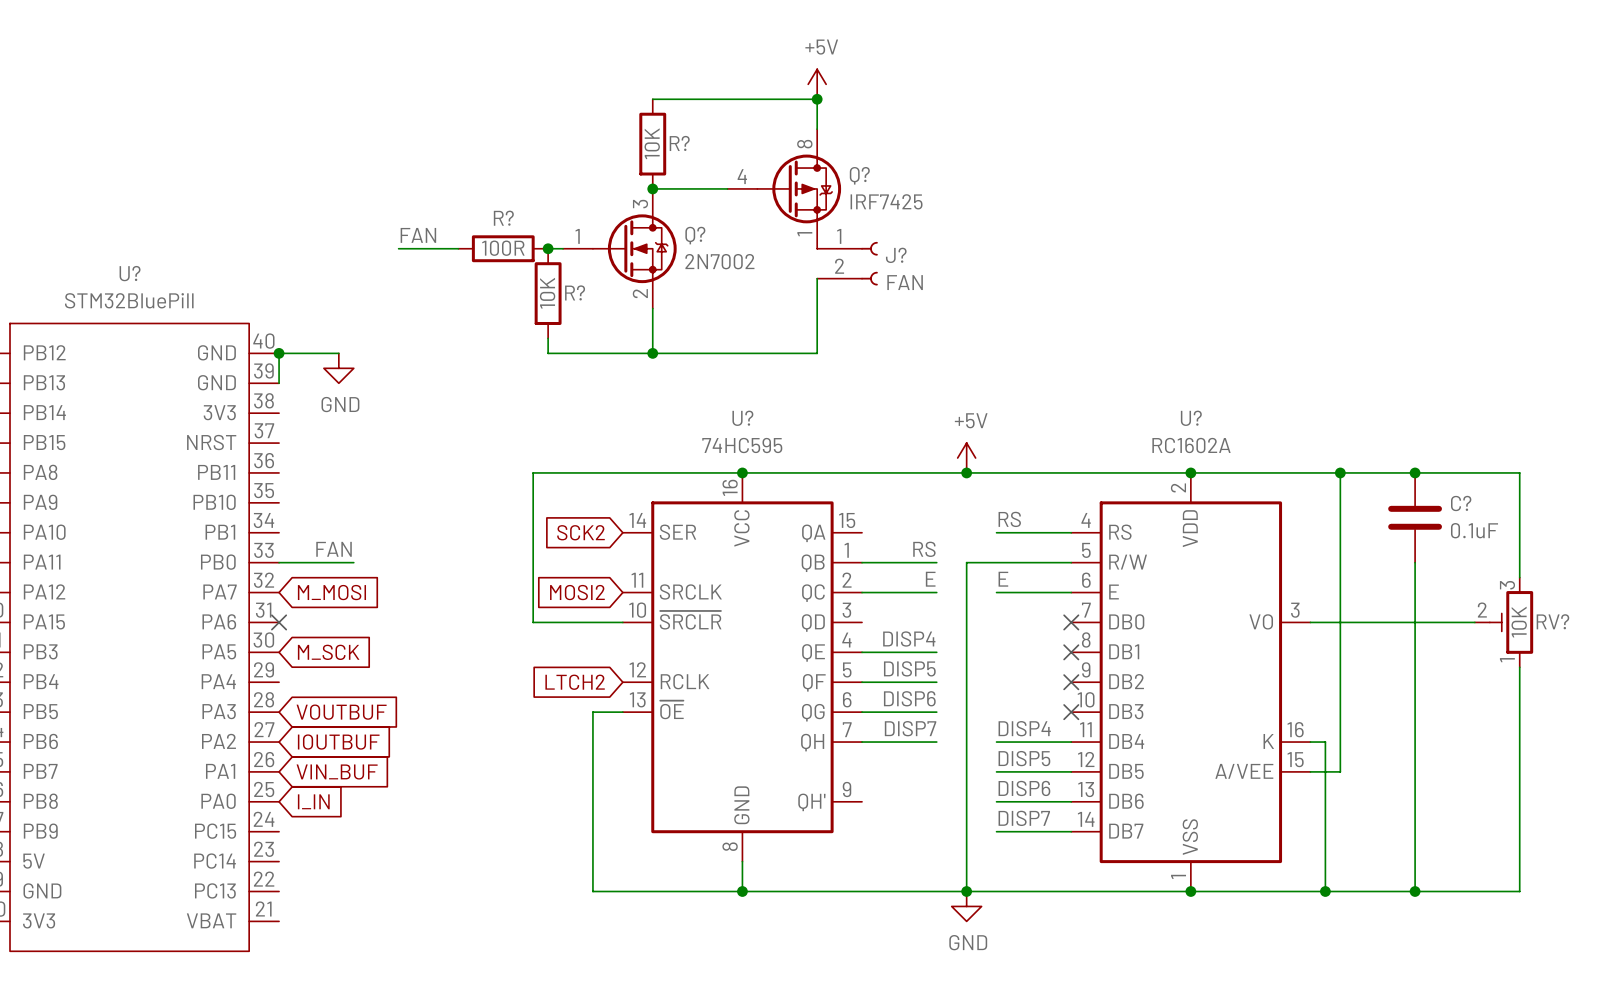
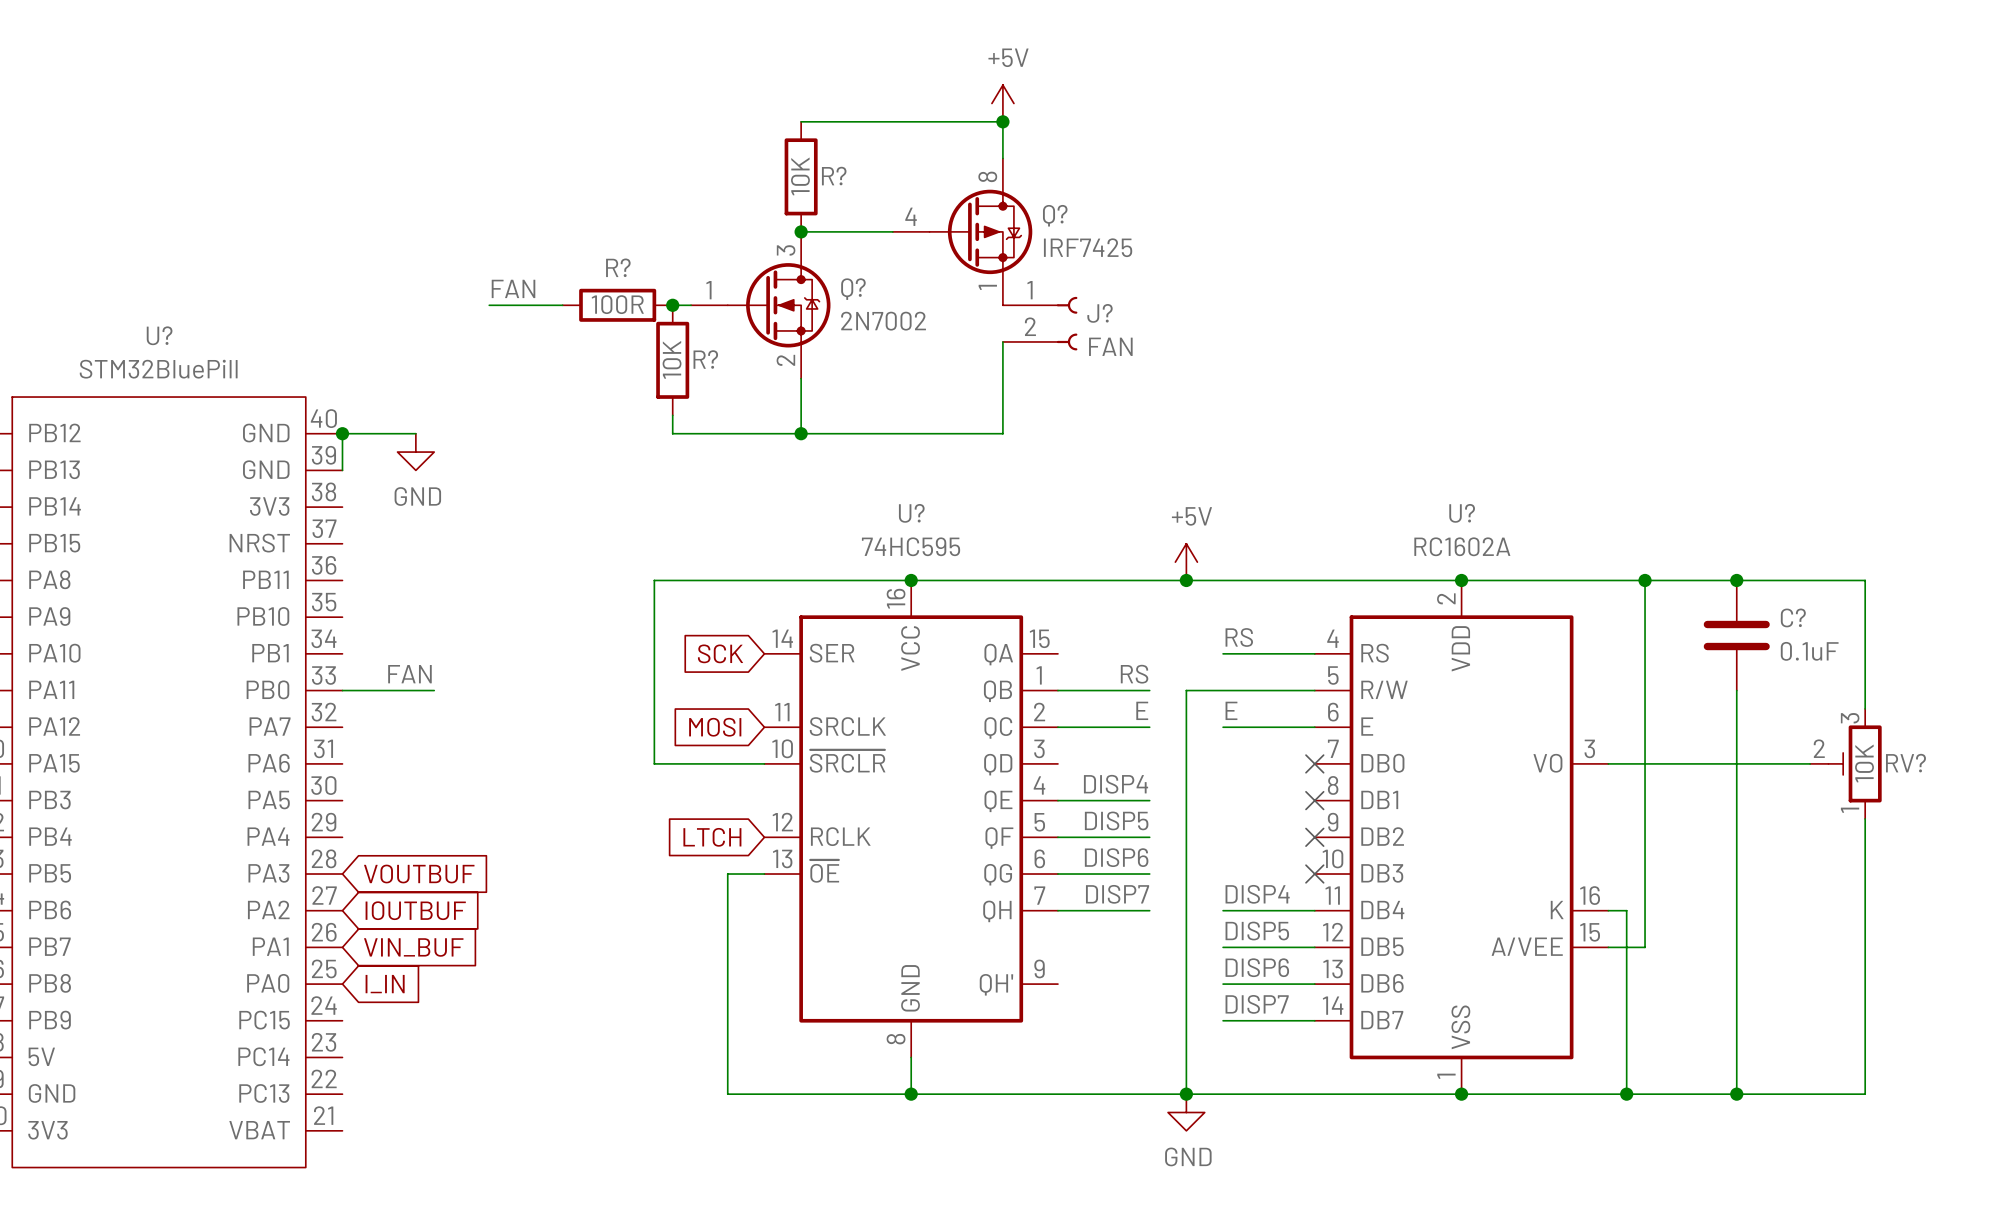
global label: SCK2 (581, 532) -> SCK (720, 653)
global label: M_MOSI (331, 592) -> none
global label: MOSI2 (577, 592) -> MOSI (715, 727)
no-connect mark: (279, 622) -> none
global label: M_SCK (328, 652) -> none
global label: LTCH2 (575, 682) -> LTCH (712, 837)

